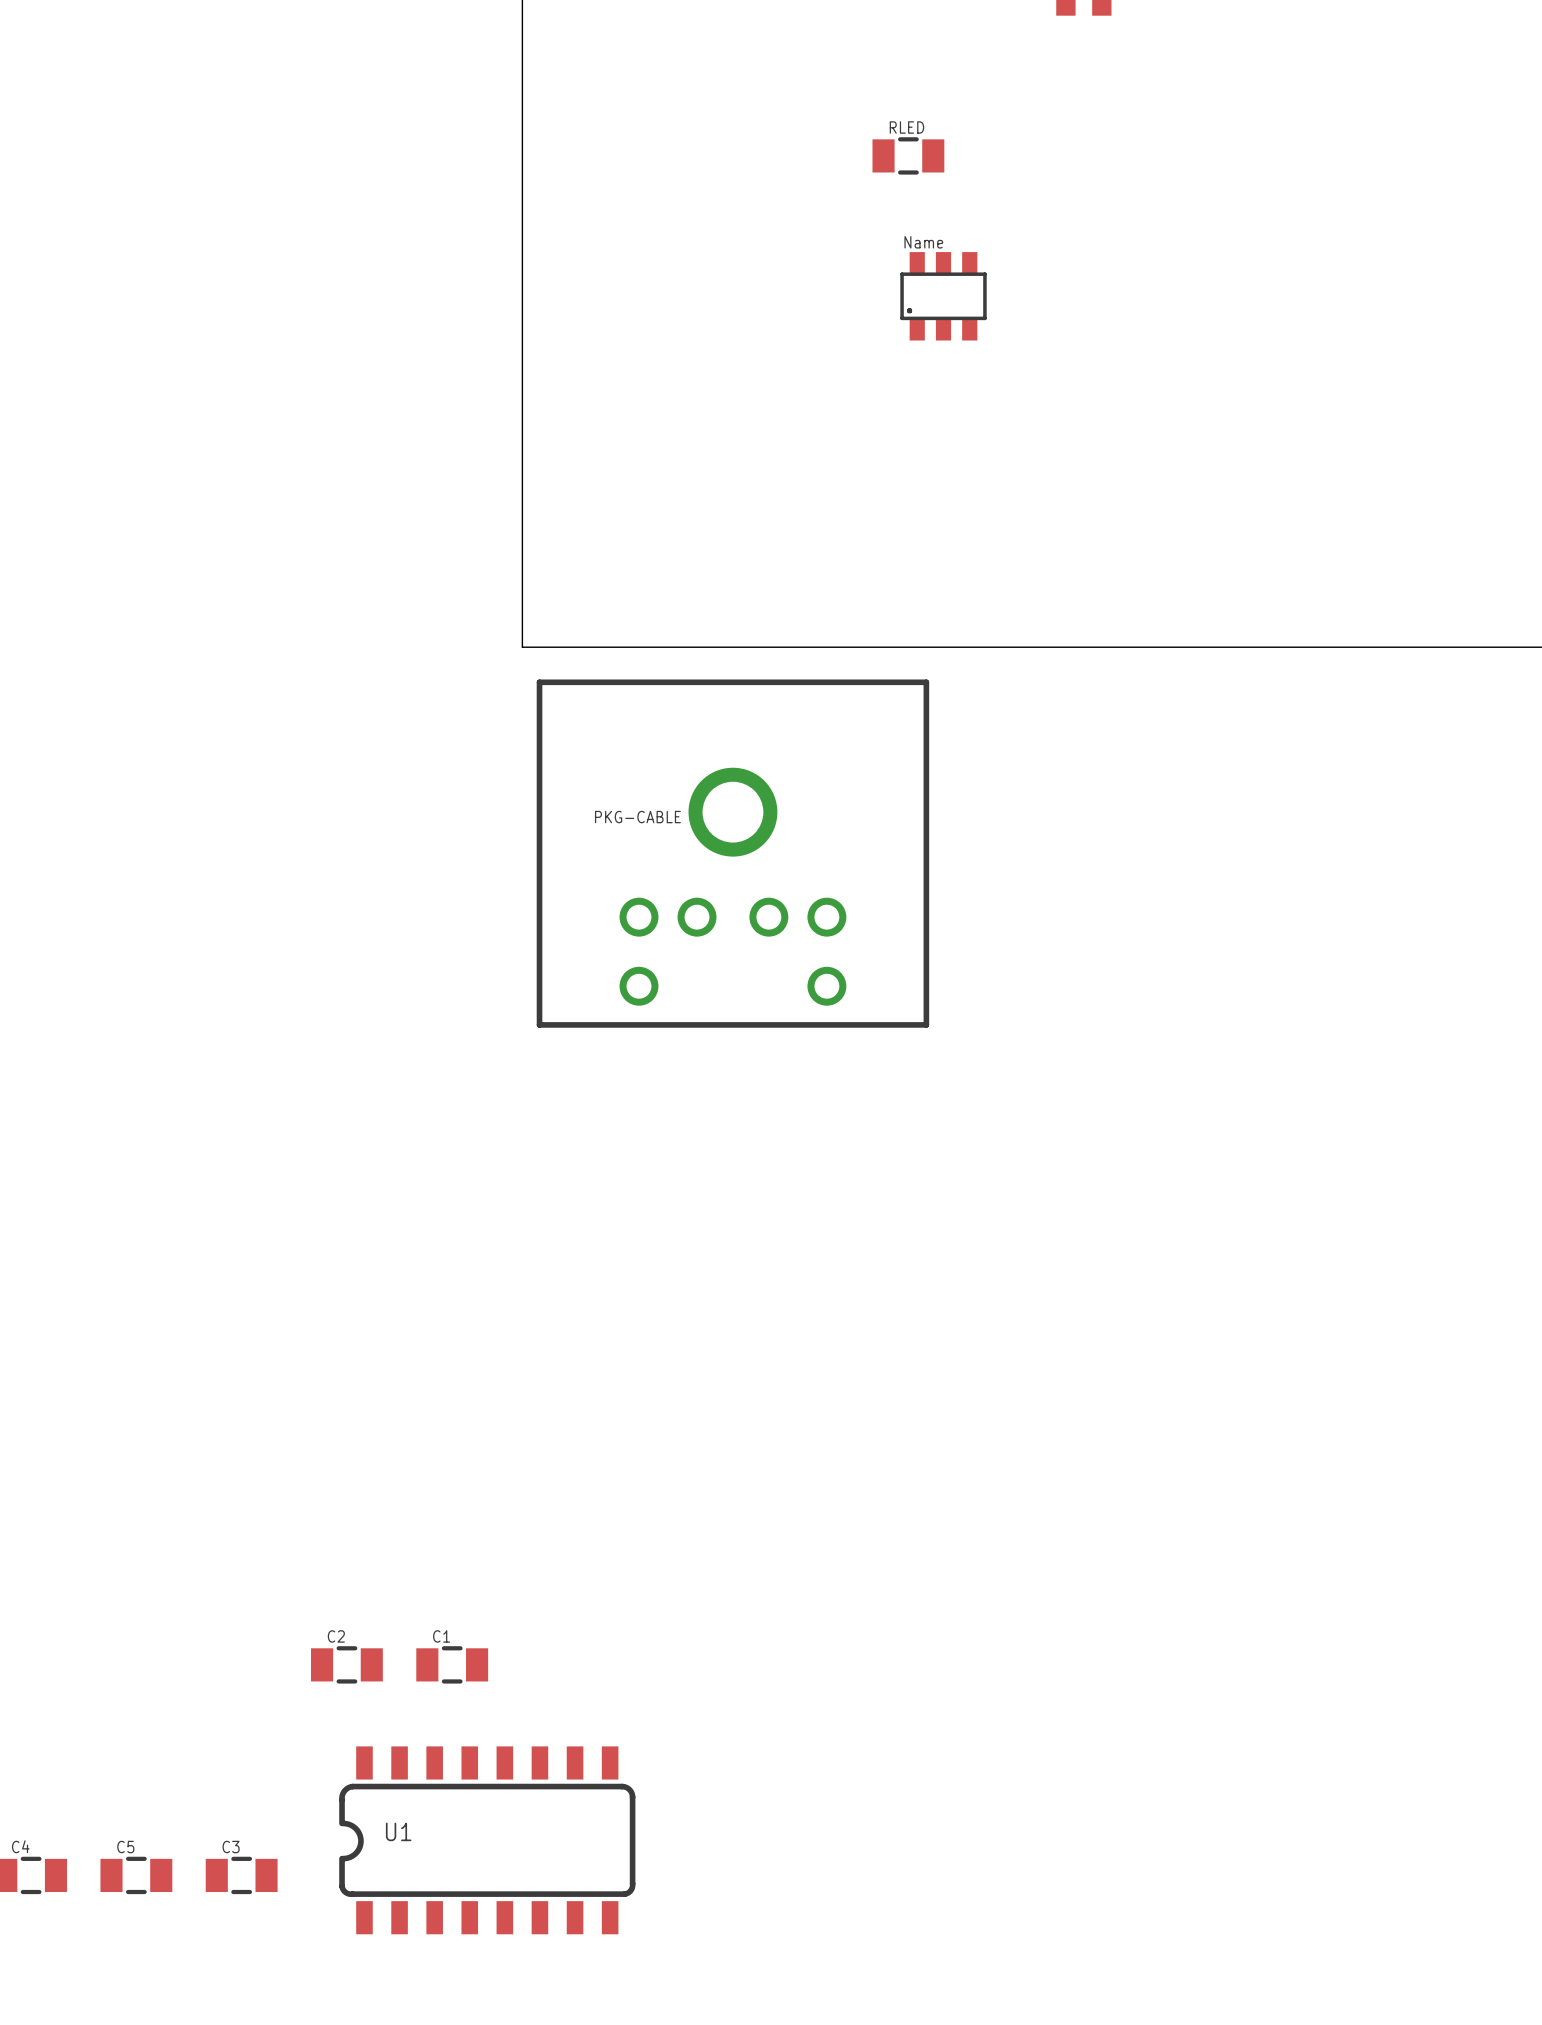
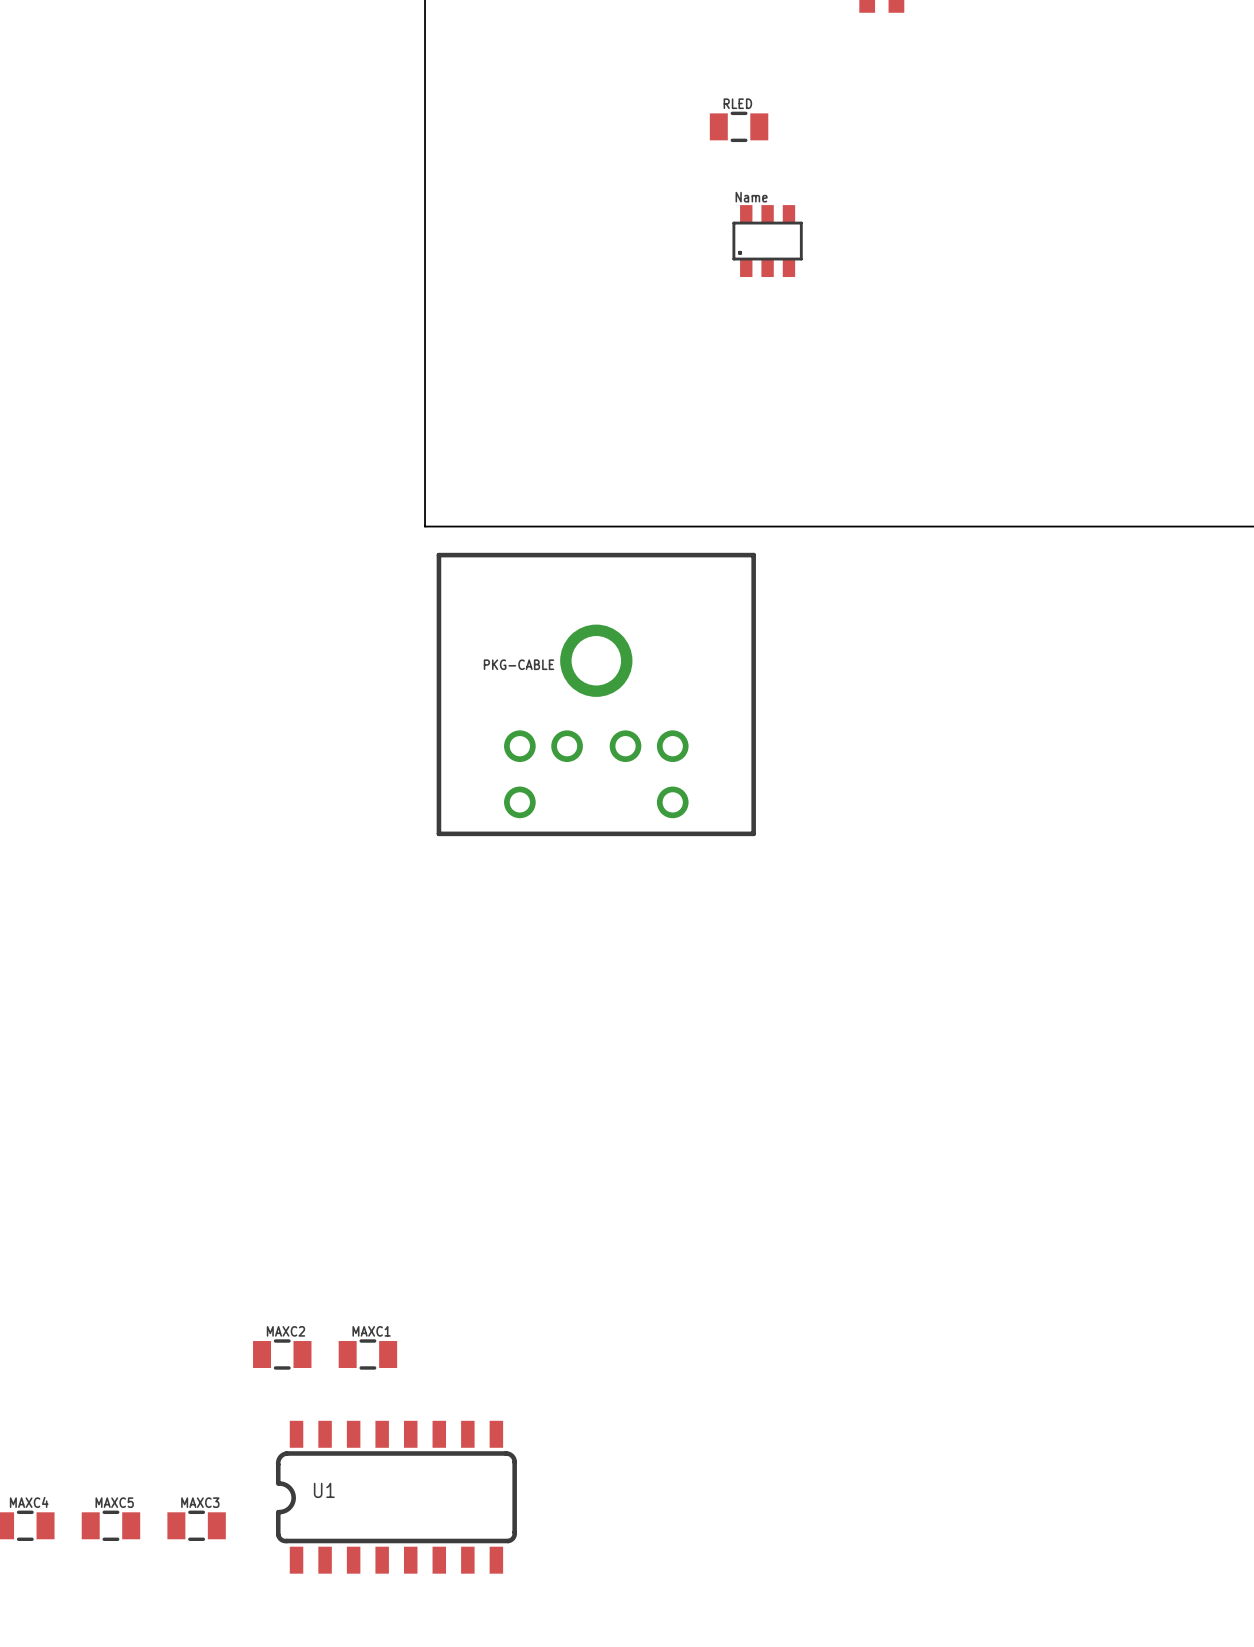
C2 name: C2 (336, 1636) -> MAXC2 (285, 1331)
C1 name: C1 (441, 1636) -> MAXC1 (371, 1331)
C4 name: C4 (20, 1846) -> MAXC4 (29, 1502)
C5 name: C5 (125, 1847) -> MAXC5 (114, 1502)
C3 name: C3 (231, 1847) -> MAXC3 (200, 1502)

